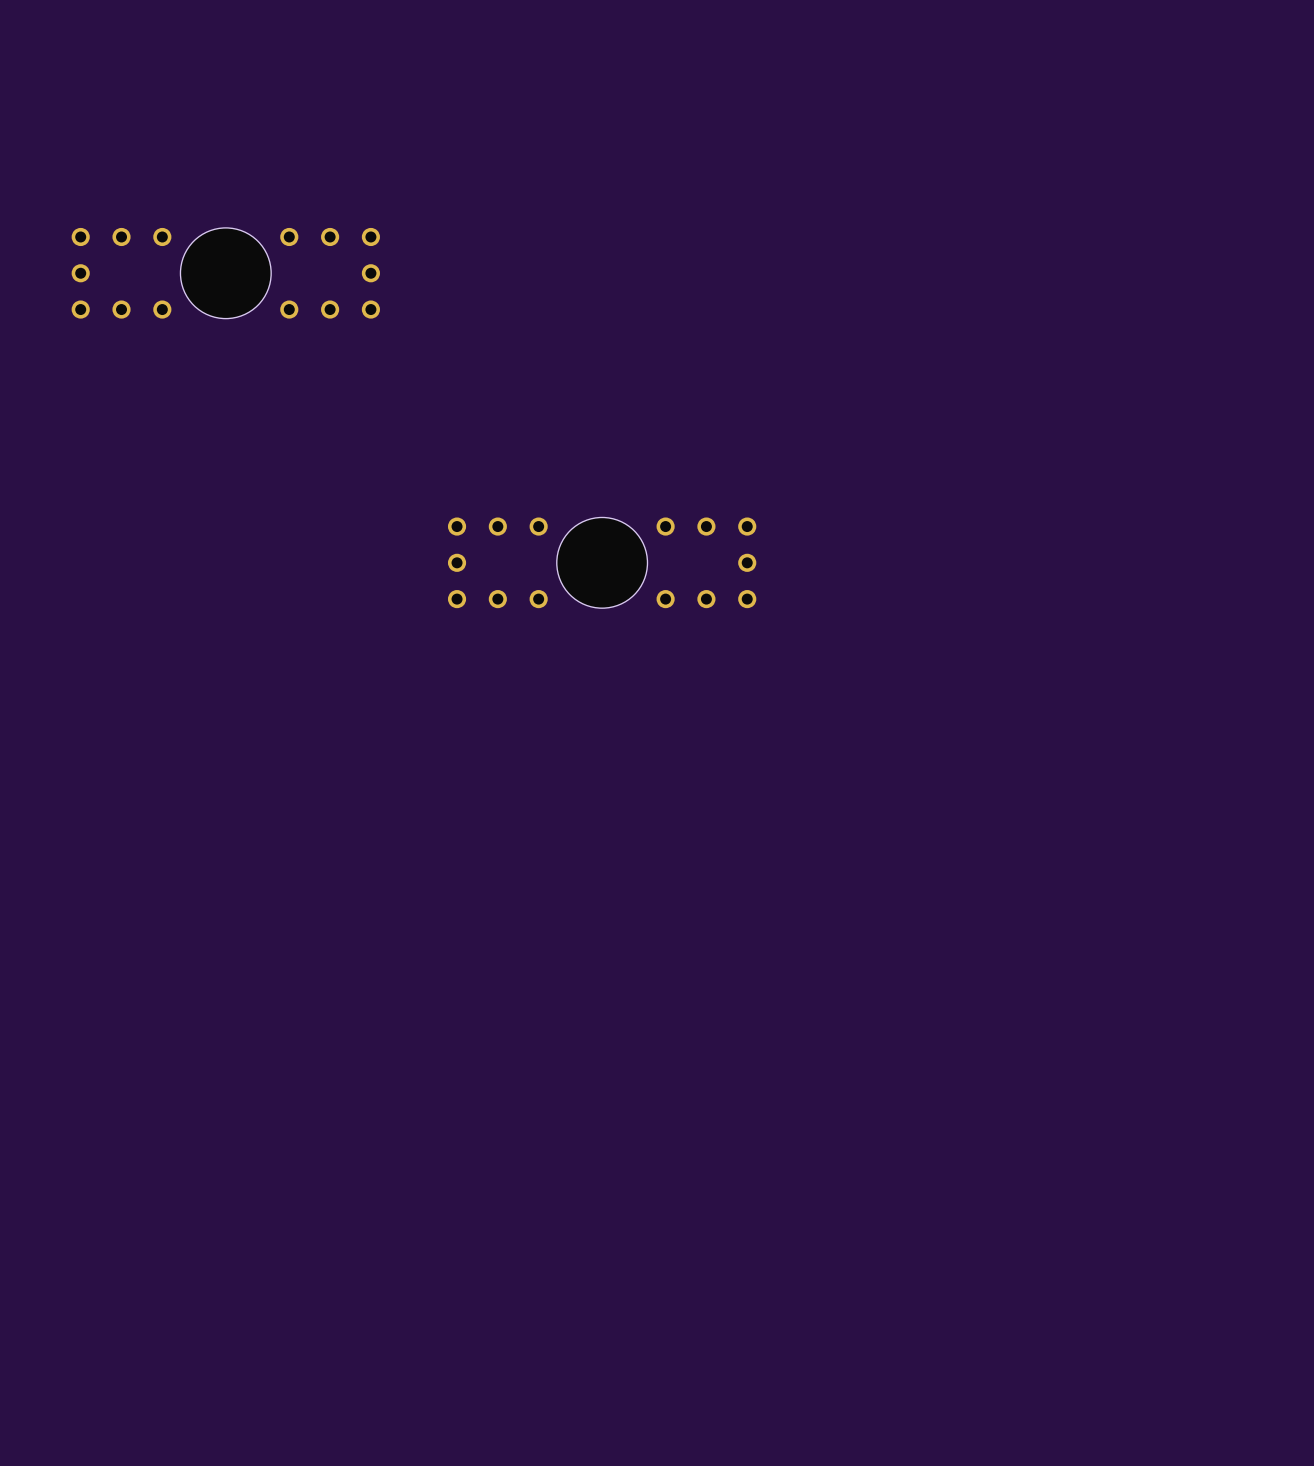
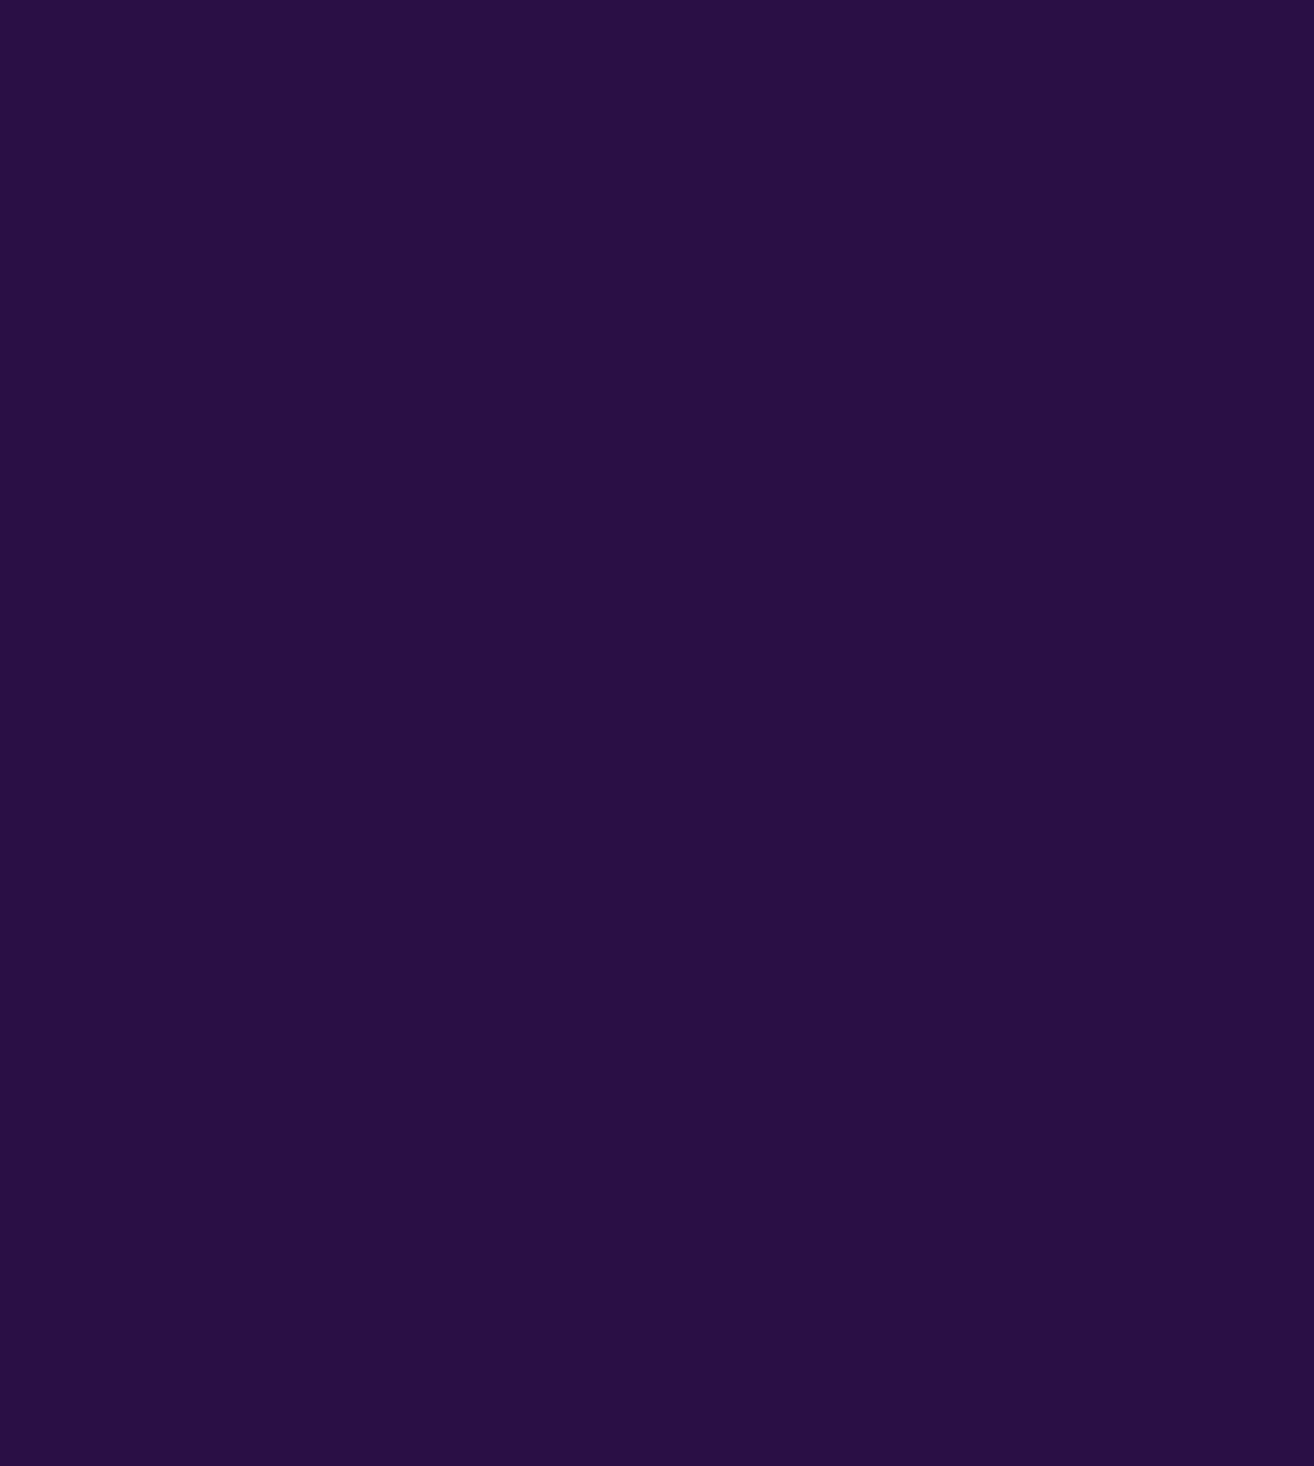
part: (225, 273) -> none
part: (602, 562) -> none

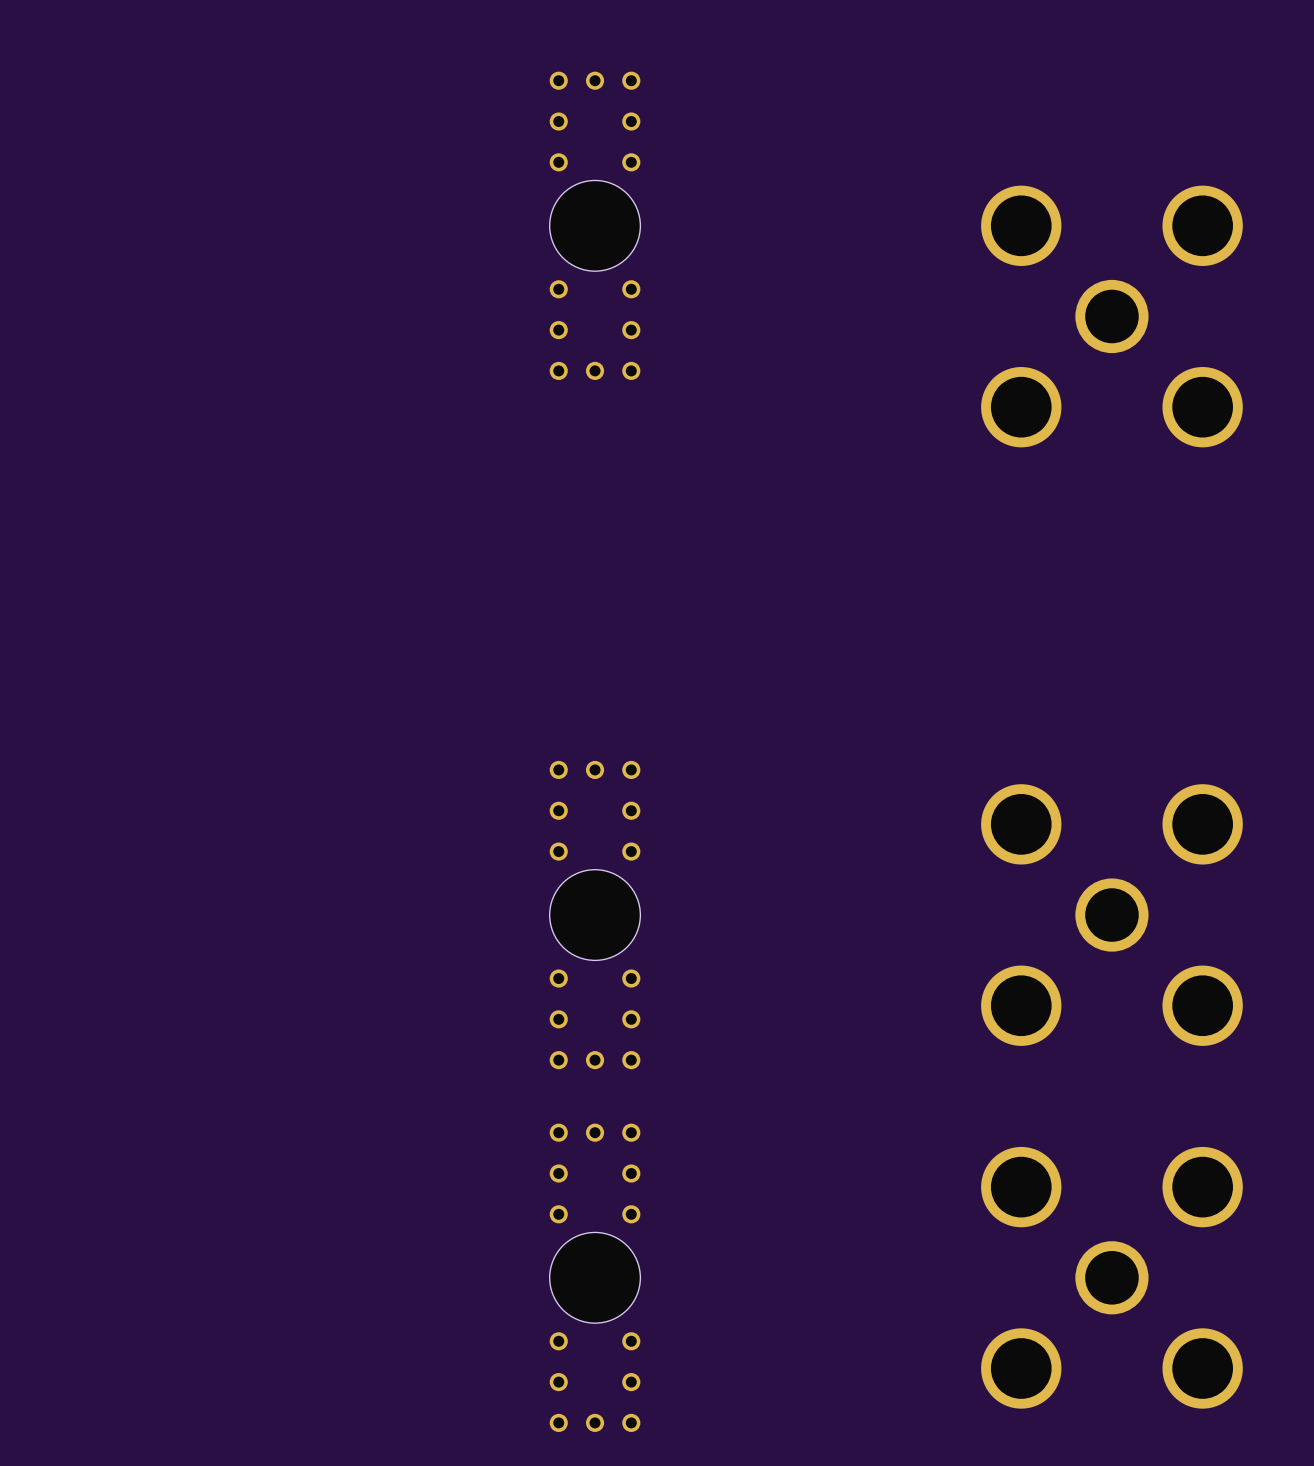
part: none -> (595, 225)
part: none -> (1111, 316)
part: none -> (595, 915)
part: none -> (1111, 915)
part: none -> (595, 1277)
part: none -> (1111, 1277)

